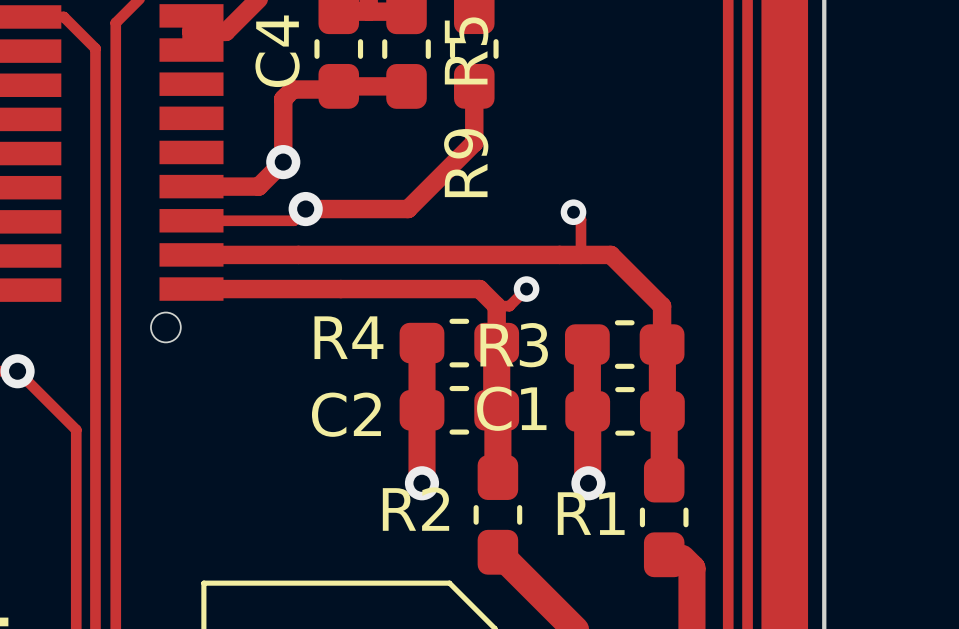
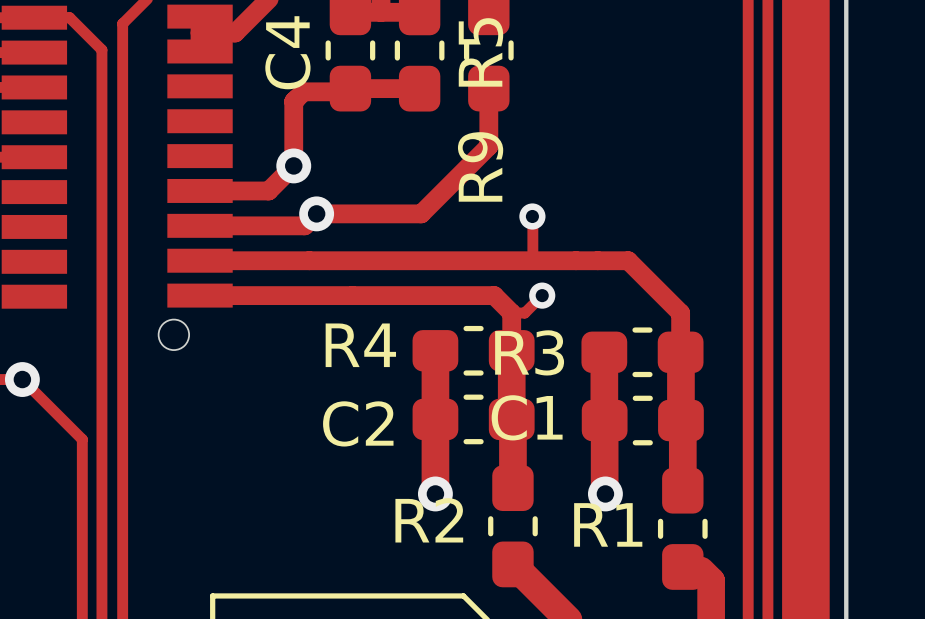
track width: thin (305, 209) (293, 220) (191, 220) -> thick (316, 213) (304, 225) (200, 225)
track: none -> (532, 216) (532, 260)
track: (573, 212) (580, 219) (580, 254) -> none
via position: (573, 212) -> (532, 216)

